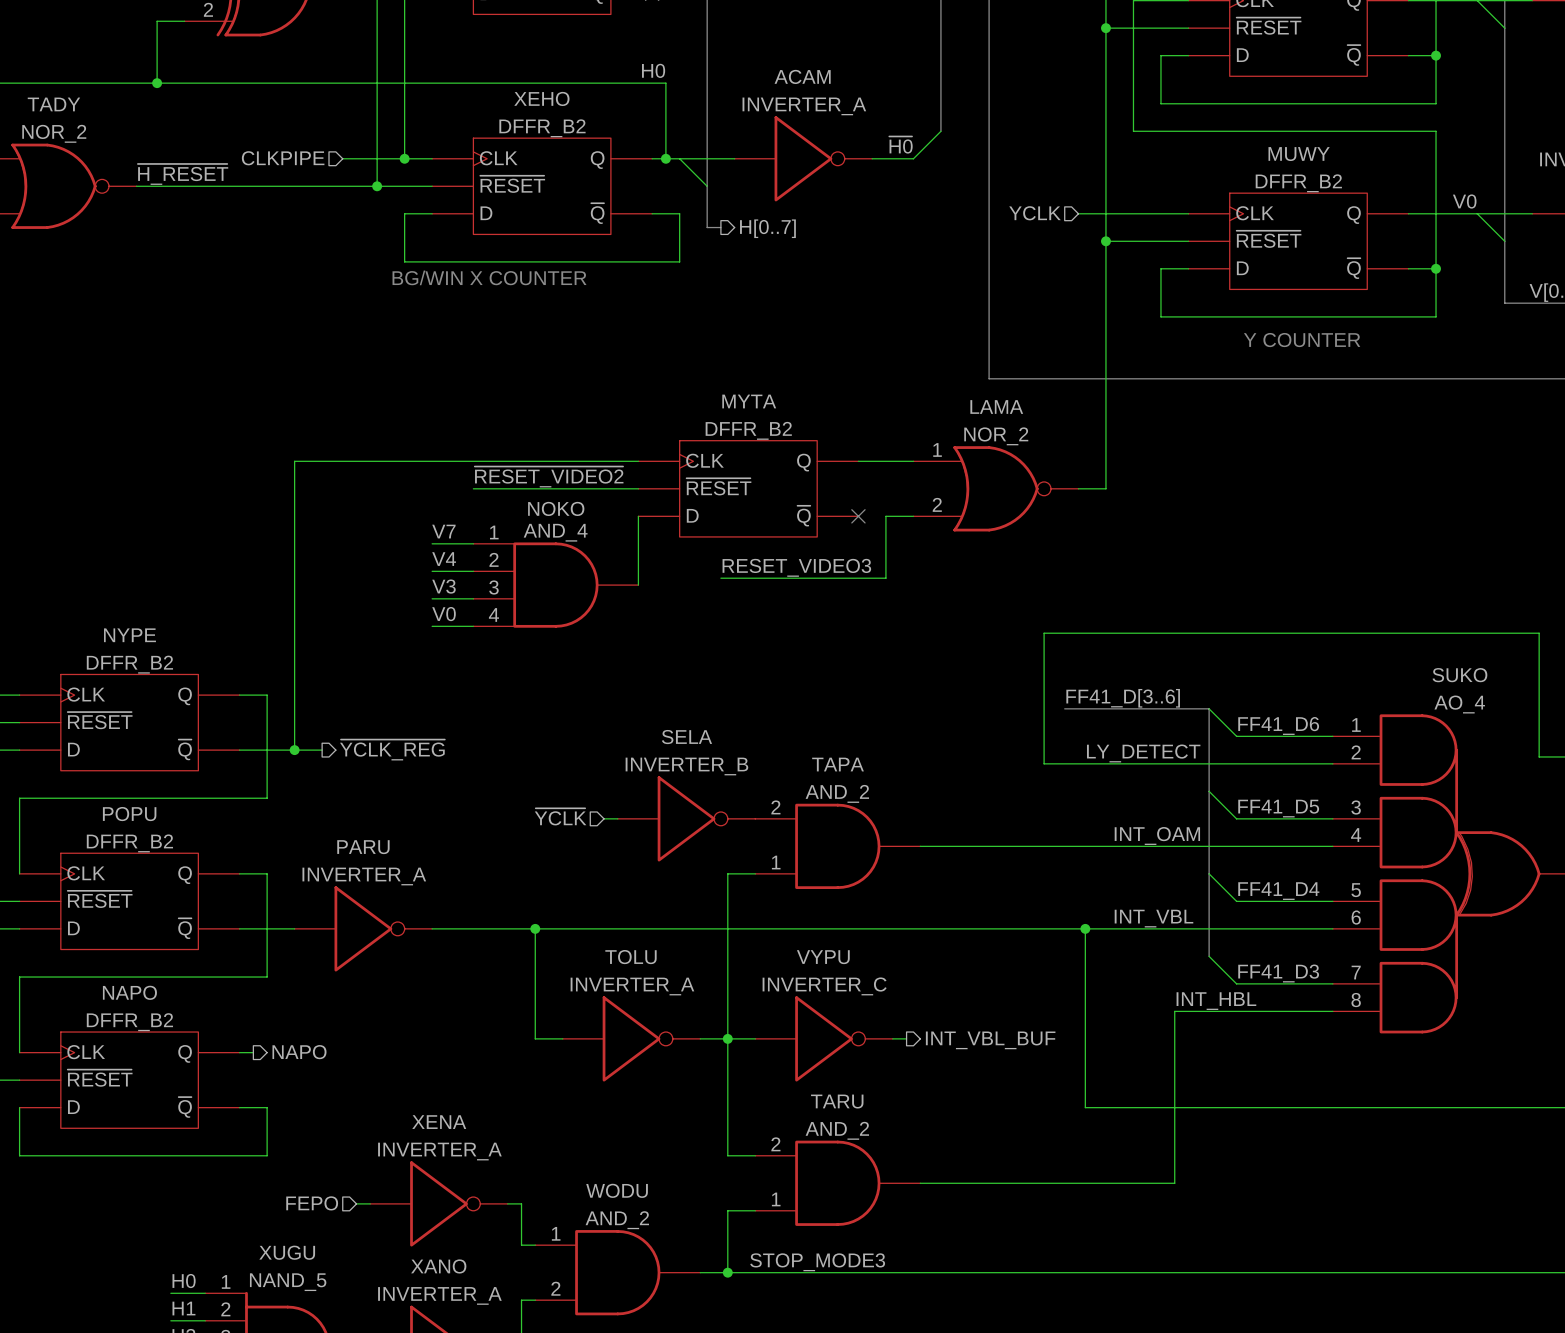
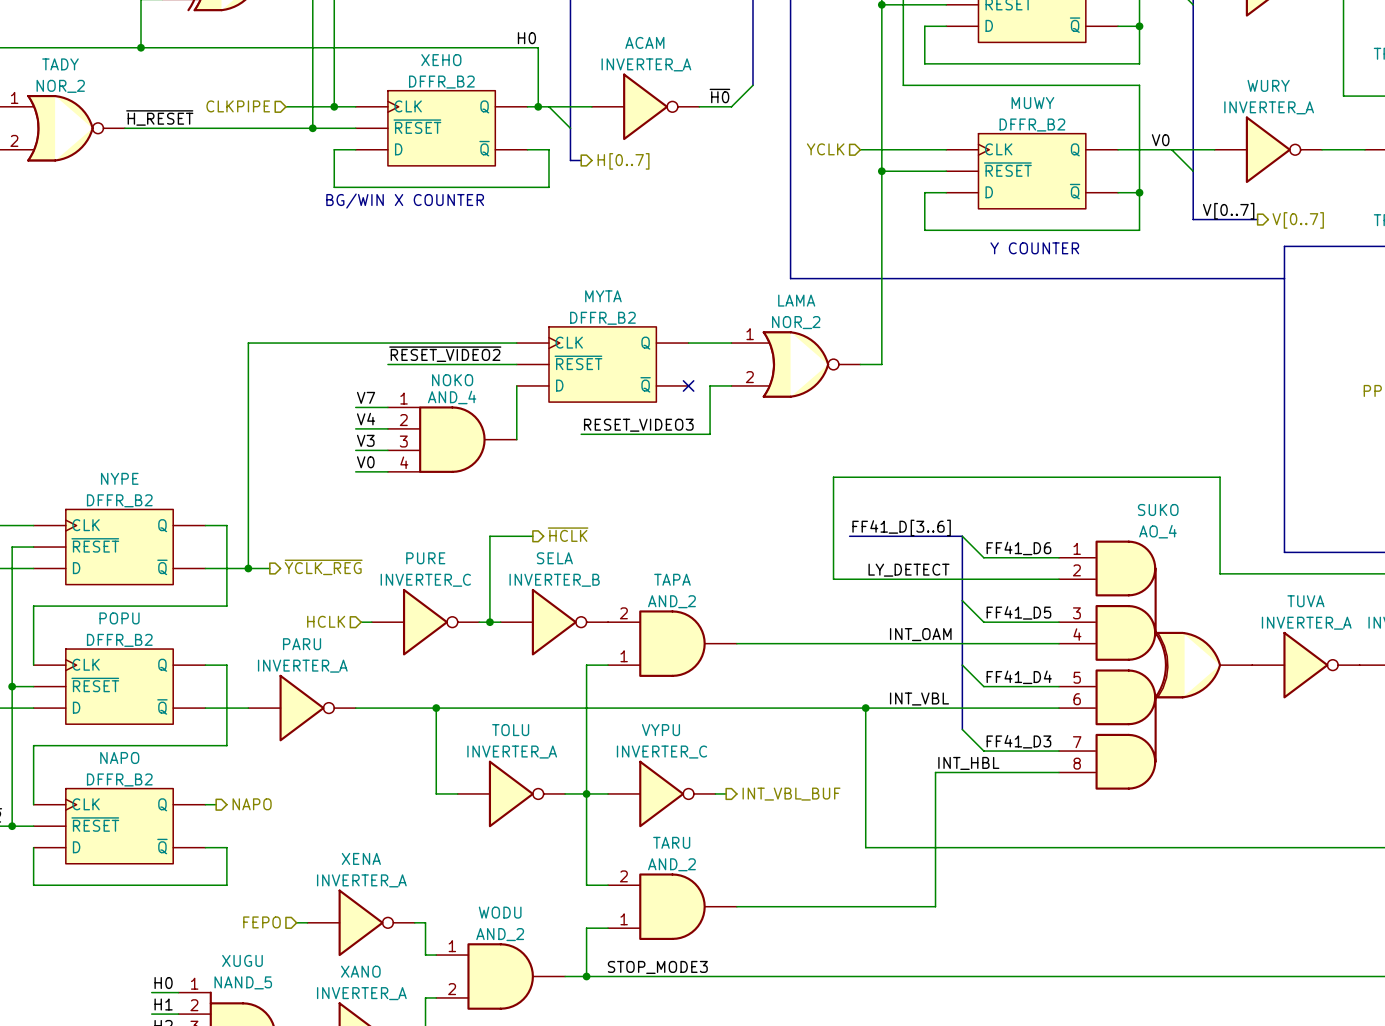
hierarchical label: none -> ~{HCLK} (568, 534)
wire: none -> (532, 536) (489, 536) (489, 622) (479, 622)
hierarchical label: ~{YCLK} (560, 816) -> none
hierarchical label: none -> HCLK (326, 621)
wire: none -> (361, 622) (371, 622)
PURE: none -> INVERTER_C (425, 622)
junction: none -> (489, 622)

